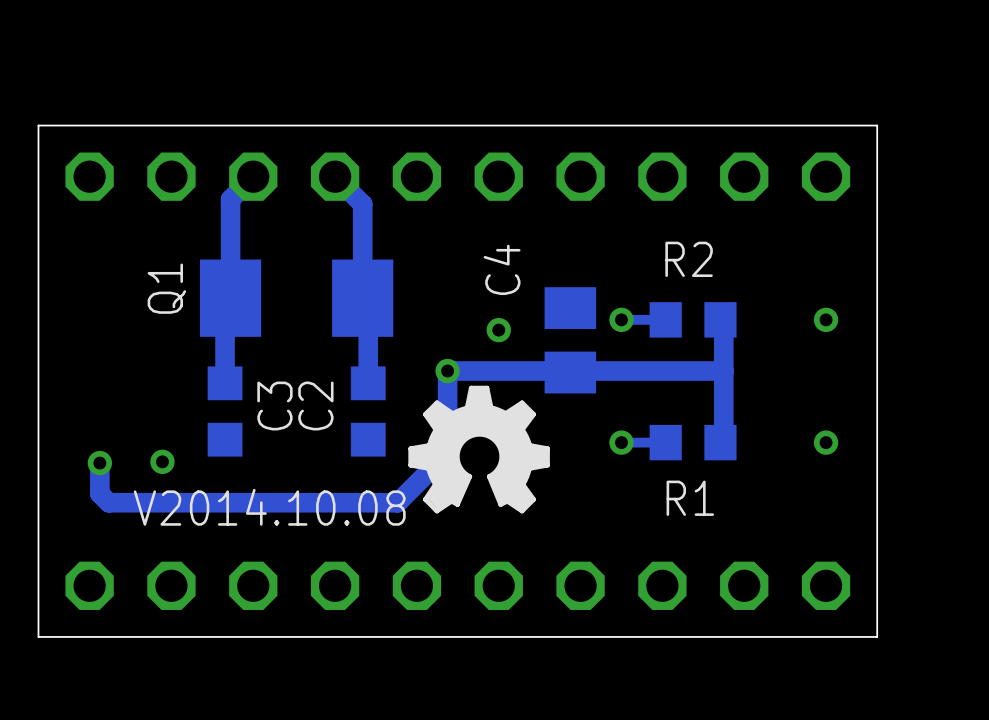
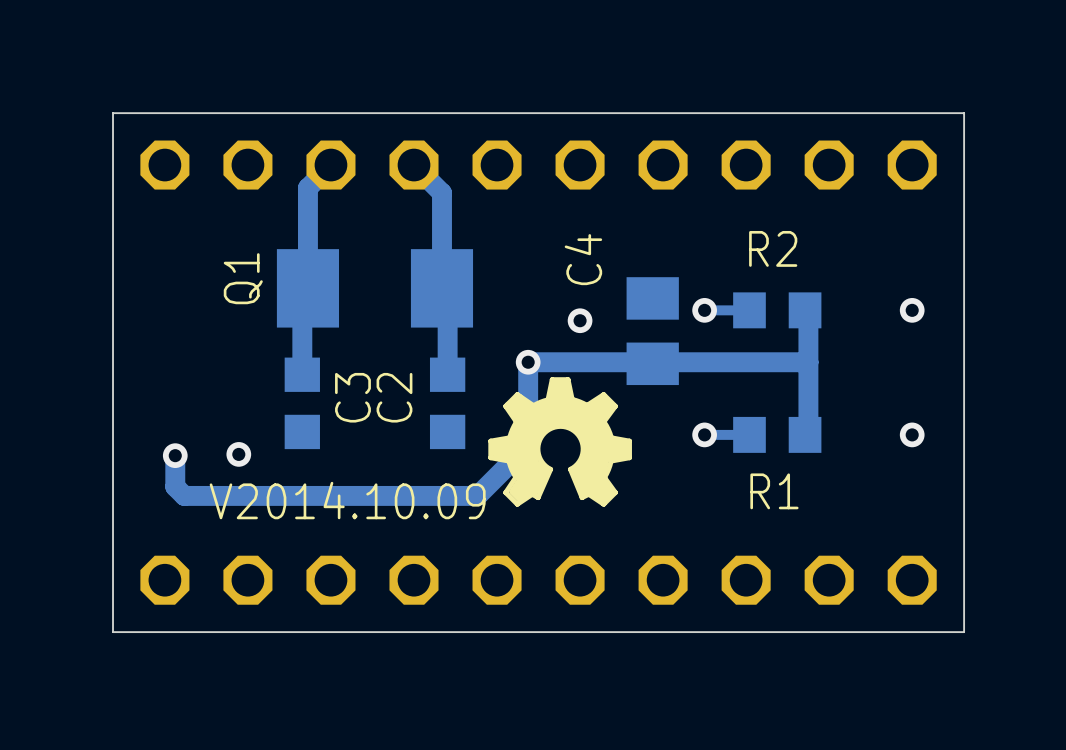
text: V2014.10.08 (269, 507) -> V2014.10.09 (347, 500)

